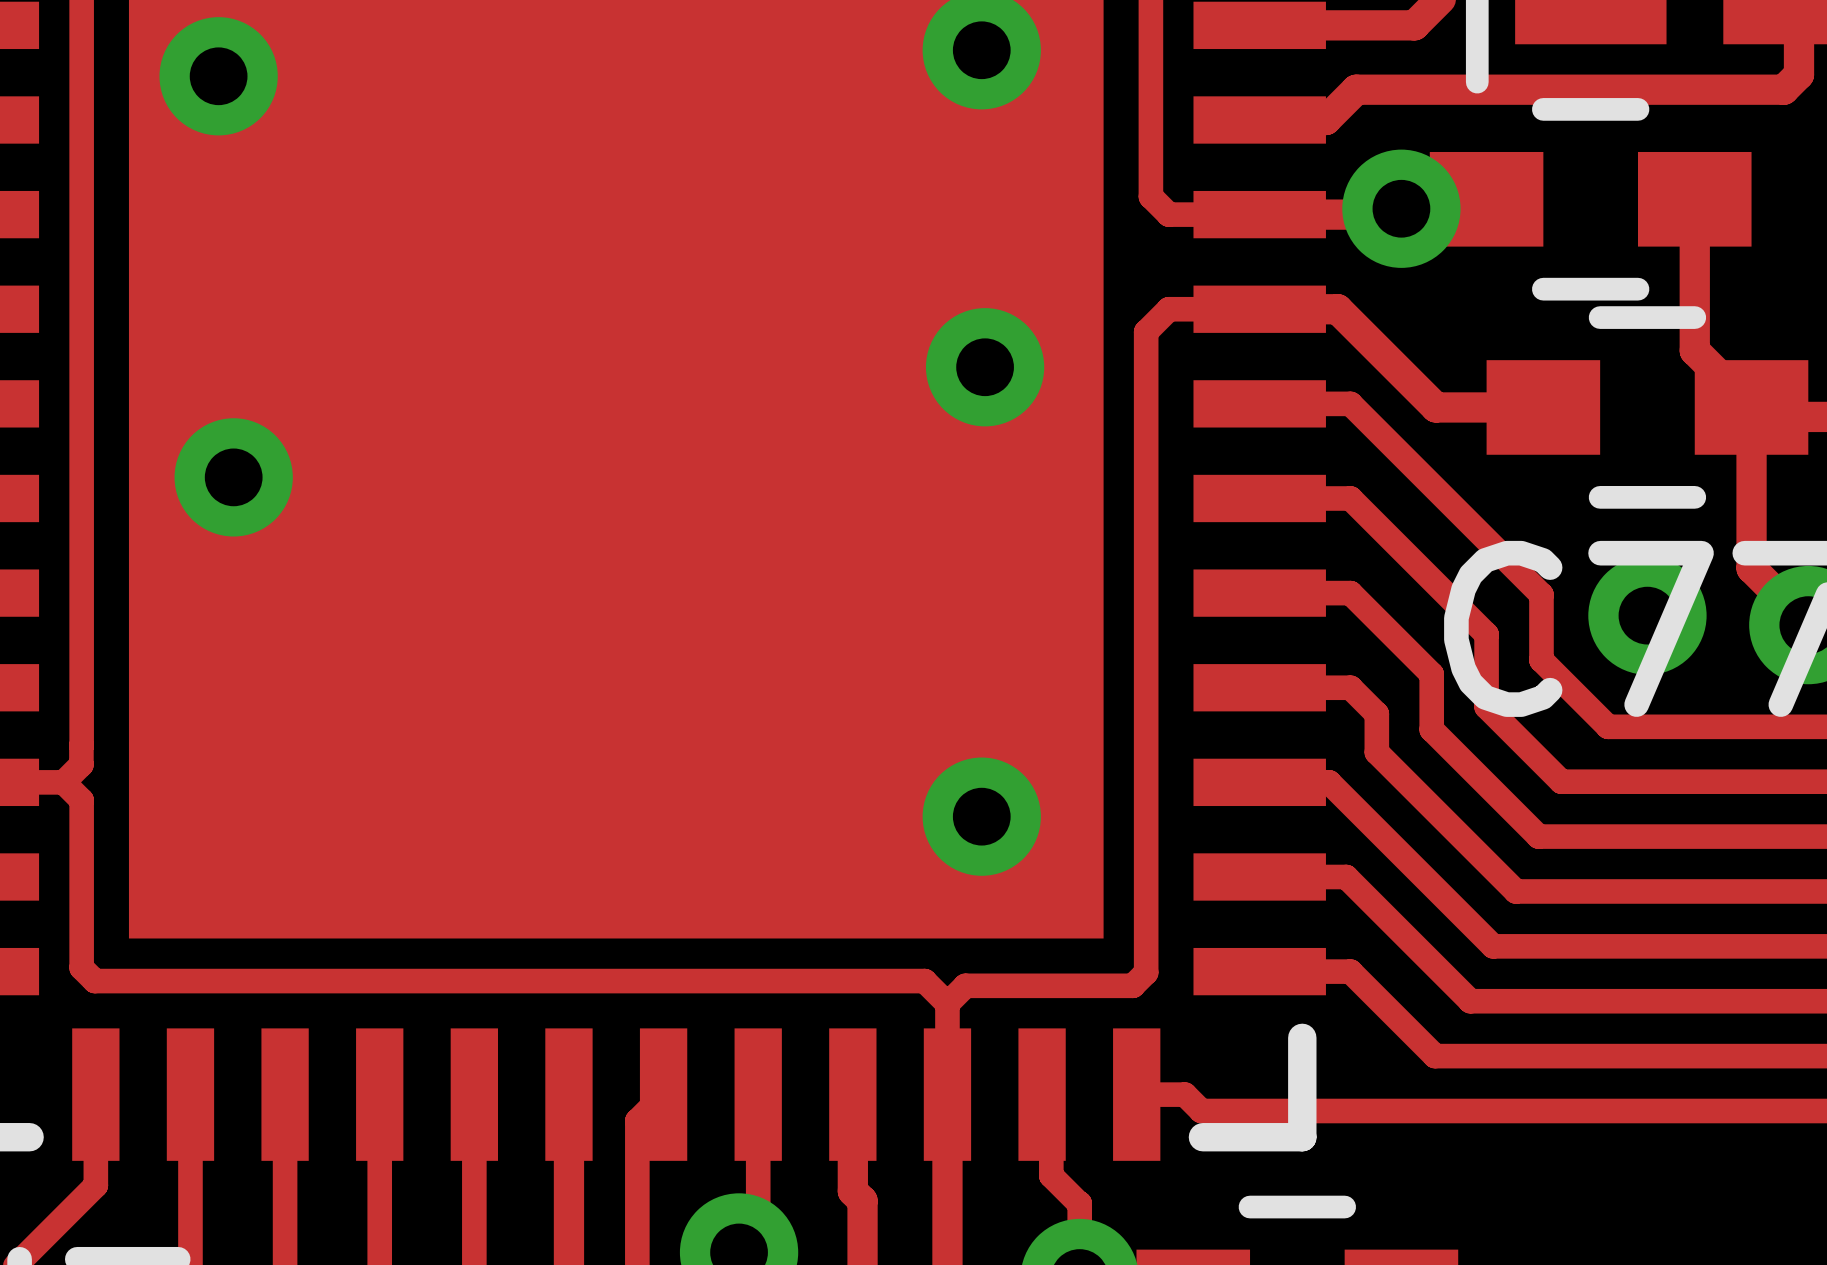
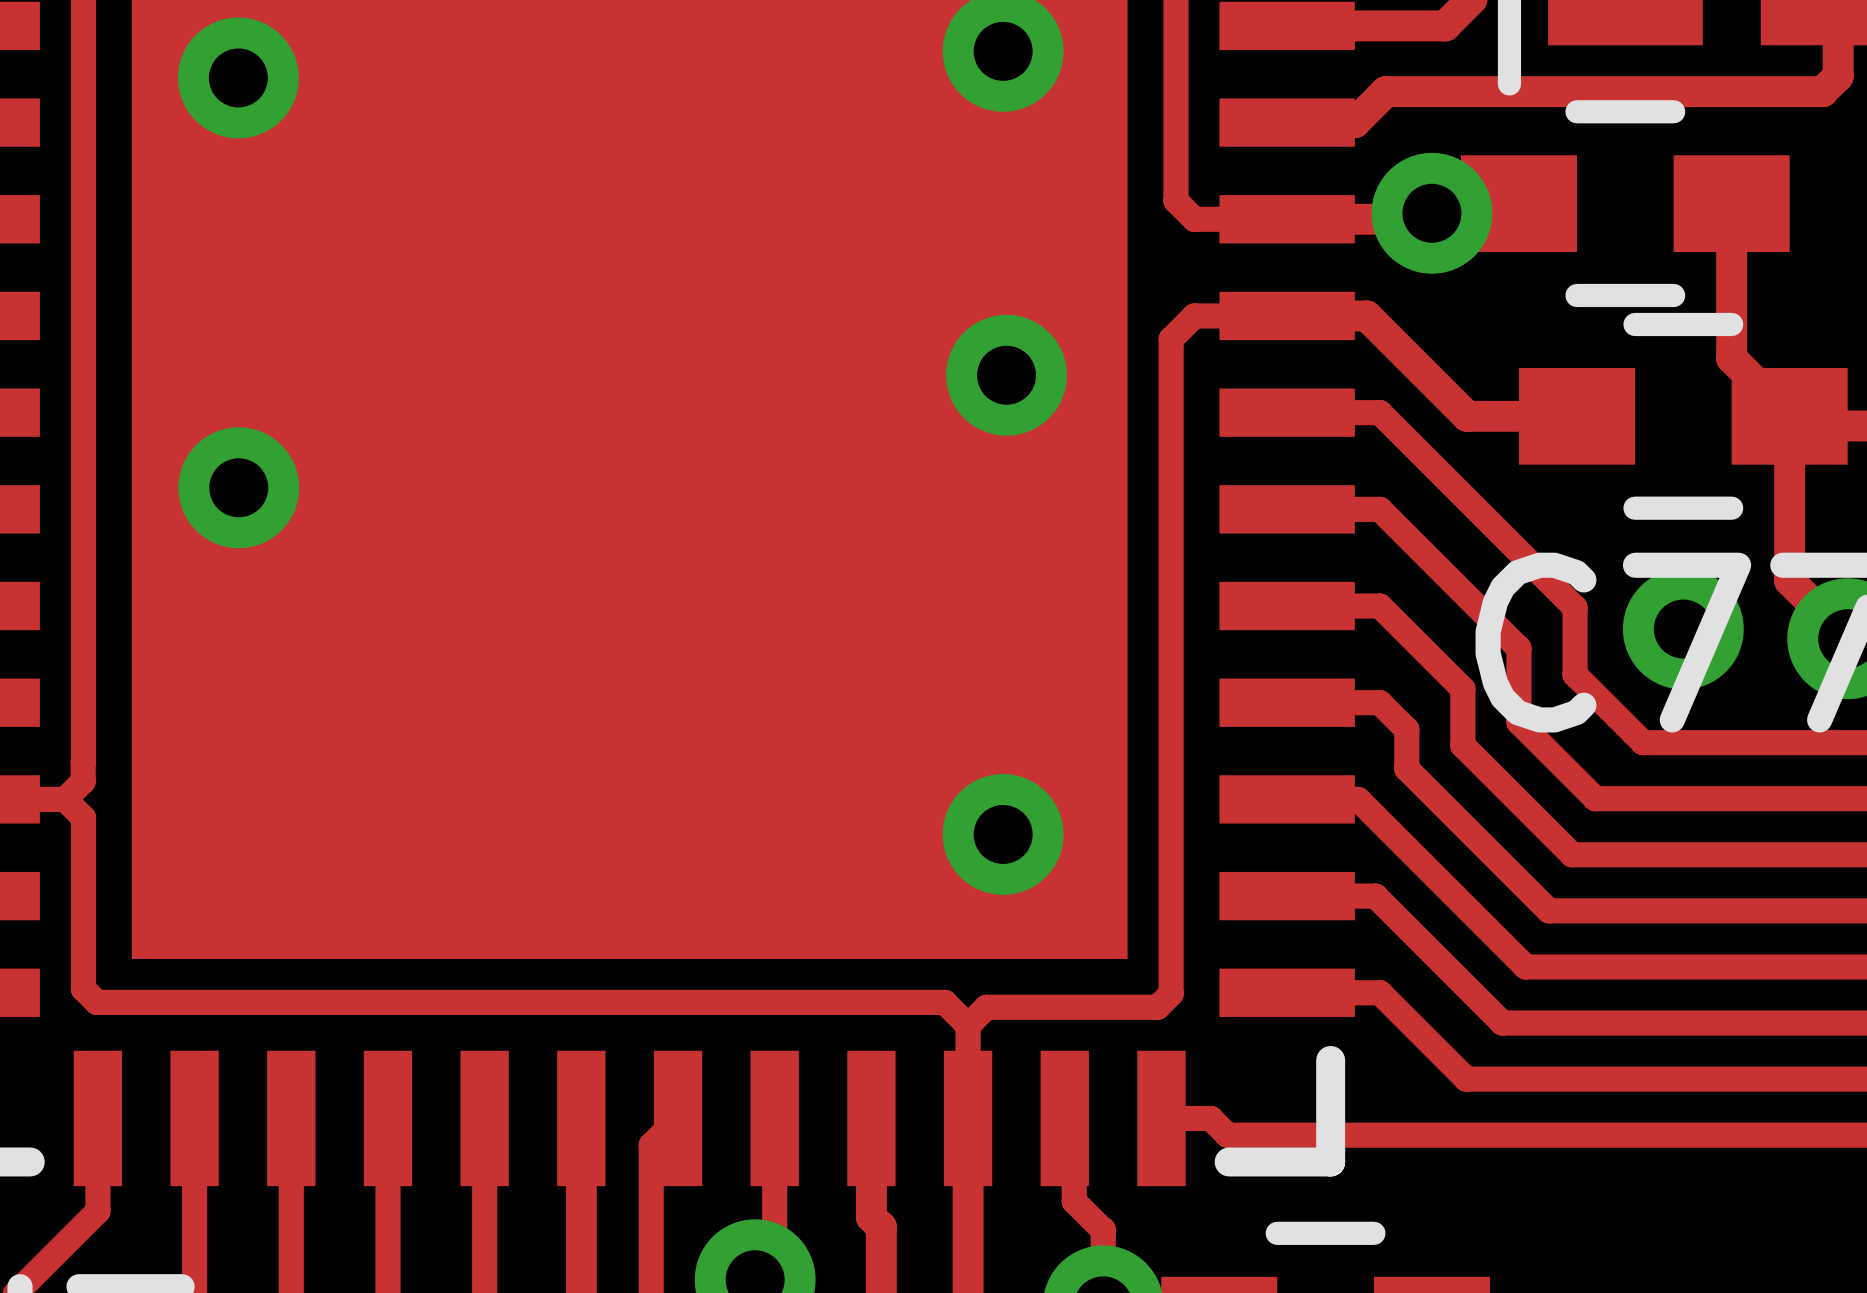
via position: (218, 76) -> (238, 77)

